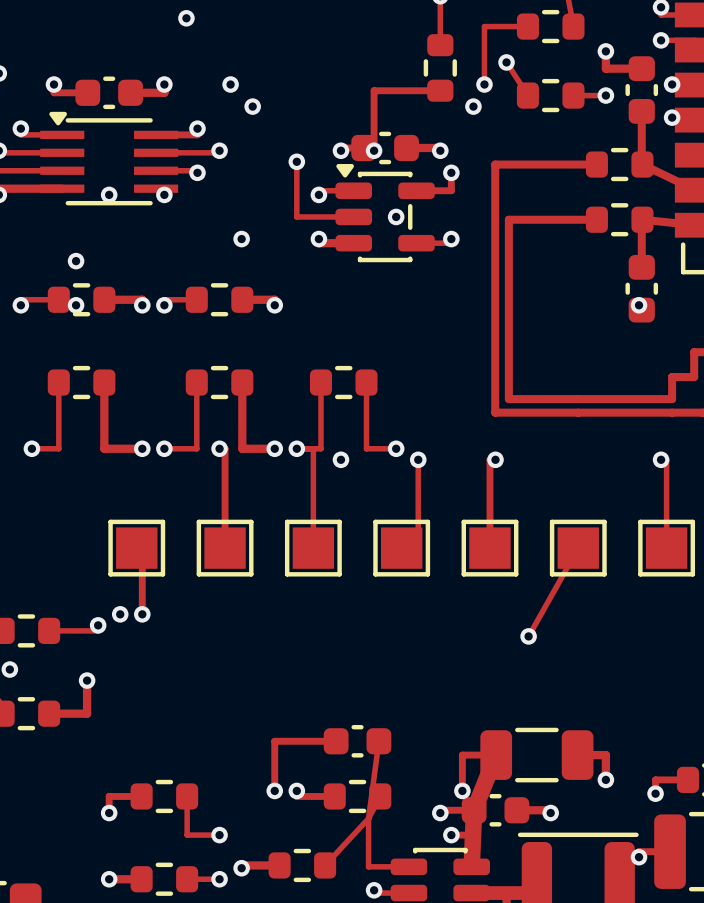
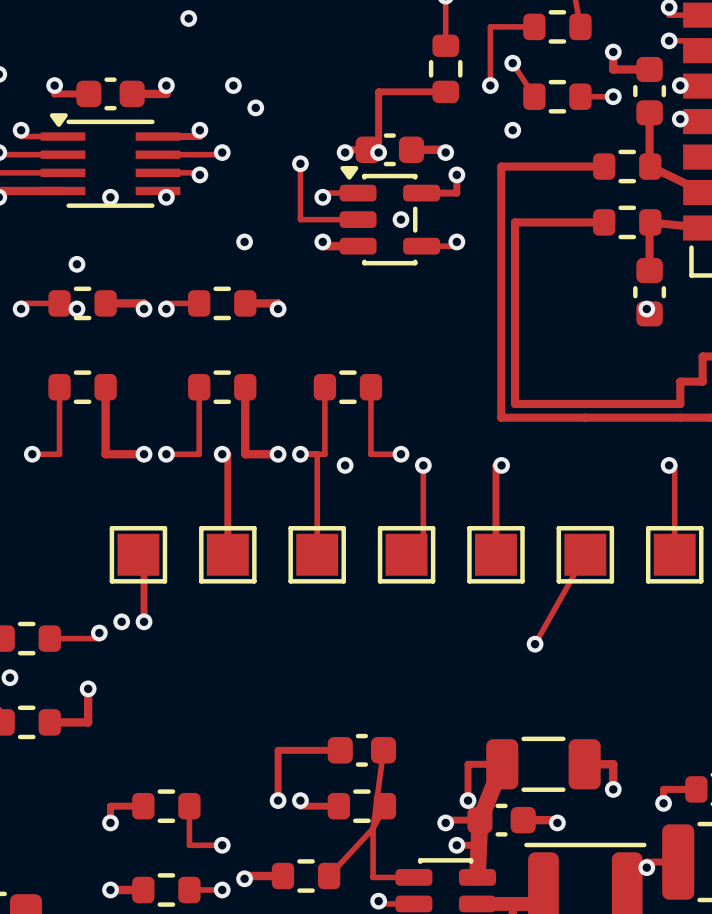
via position: (473, 106) -> (512, 130)

